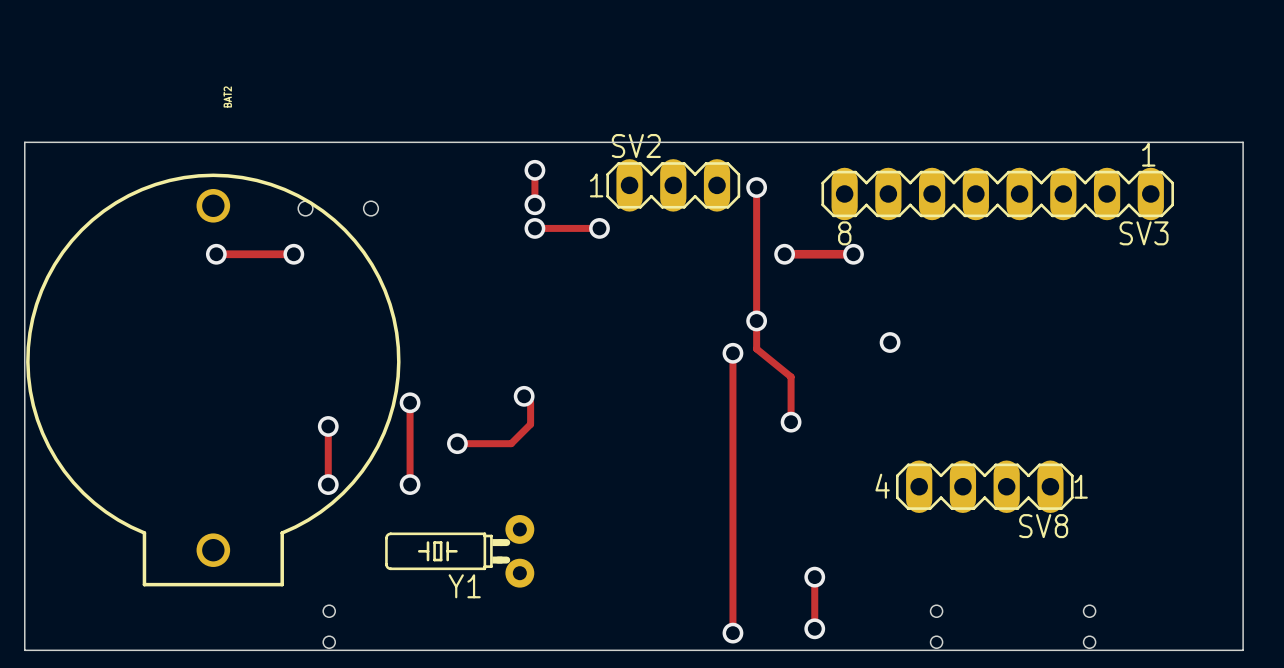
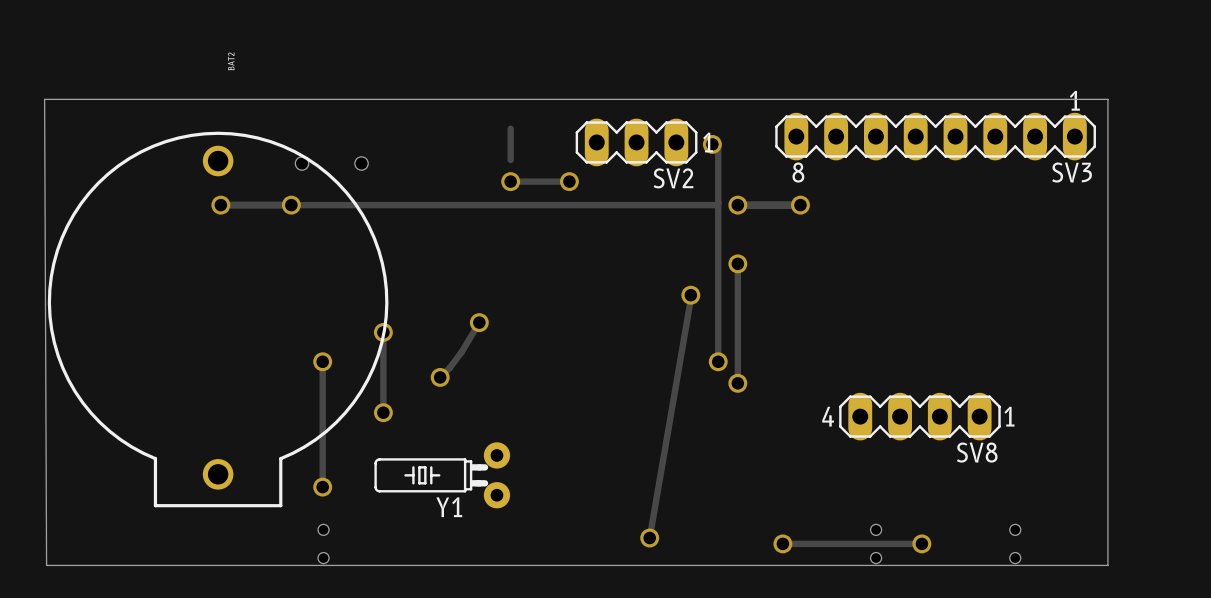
SV2 name position: SV2 (636, 146) -> SV2 (673, 178)
via: (534, 170) -> none
SV2 text position: 1 (596, 185) -> 1 (708, 142)
track: (756, 187) (756, 348) (791, 376) (791, 422) -> none
track: none -> (718, 144) (718, 361)
SV3 position: (997, 193) -> (935, 136)
via: (534, 204) -> none
track: none -> (718, 203) (716, 205) (291, 205)
track: none -> (737, 263) (737, 383)
via position: (756, 320) -> (737, 263)
via: (890, 342) -> none
track: (732, 353) (732, 633) -> none
track: none -> (690, 299) (649, 538)
track: none -> (383, 332) (383, 412)
track: (524, 396) (530, 402) (530, 424) (511, 443) (457, 443) -> (479, 322) (461, 351) (440, 377)
via position: (524, 396) -> (479, 322)
track: (410, 402) (410, 484) -> none
via position: (410, 402) -> (383, 332)
via: (791, 422) -> none
via: none -> (718, 361)
via: none -> (737, 383)
track: none -> (322, 414) (322, 487)
via: (328, 484) -> none
via position: (410, 484) -> (383, 412)
via: none -> (322, 487)
track: (814, 577) (814, 628) -> none
via: (814, 577) -> none
track: none -> (782, 543) (921, 543)
via: none -> (921, 543)
via position: (814, 628) -> (782, 543)
via position: (732, 633) -> (649, 538)
board edge: (24, 650) (24, 142) (1243, 142) (1243, 650) (1191, 650) -> (46, 565) (44, 99) (1107, 99) (1107, 565)

